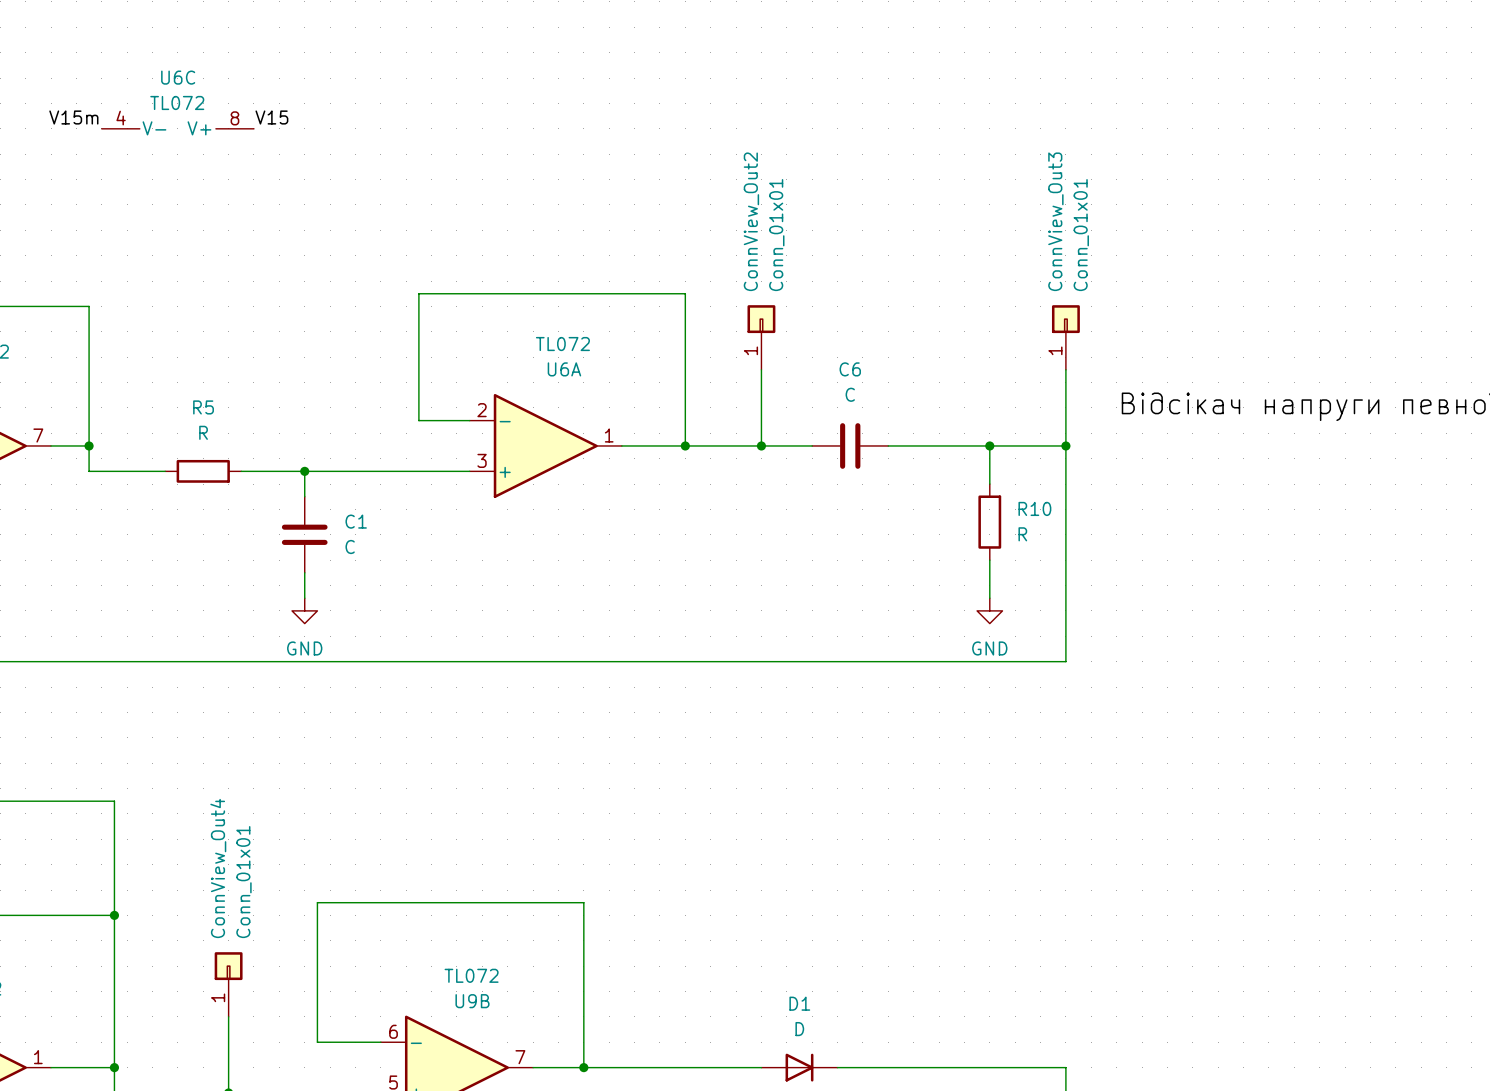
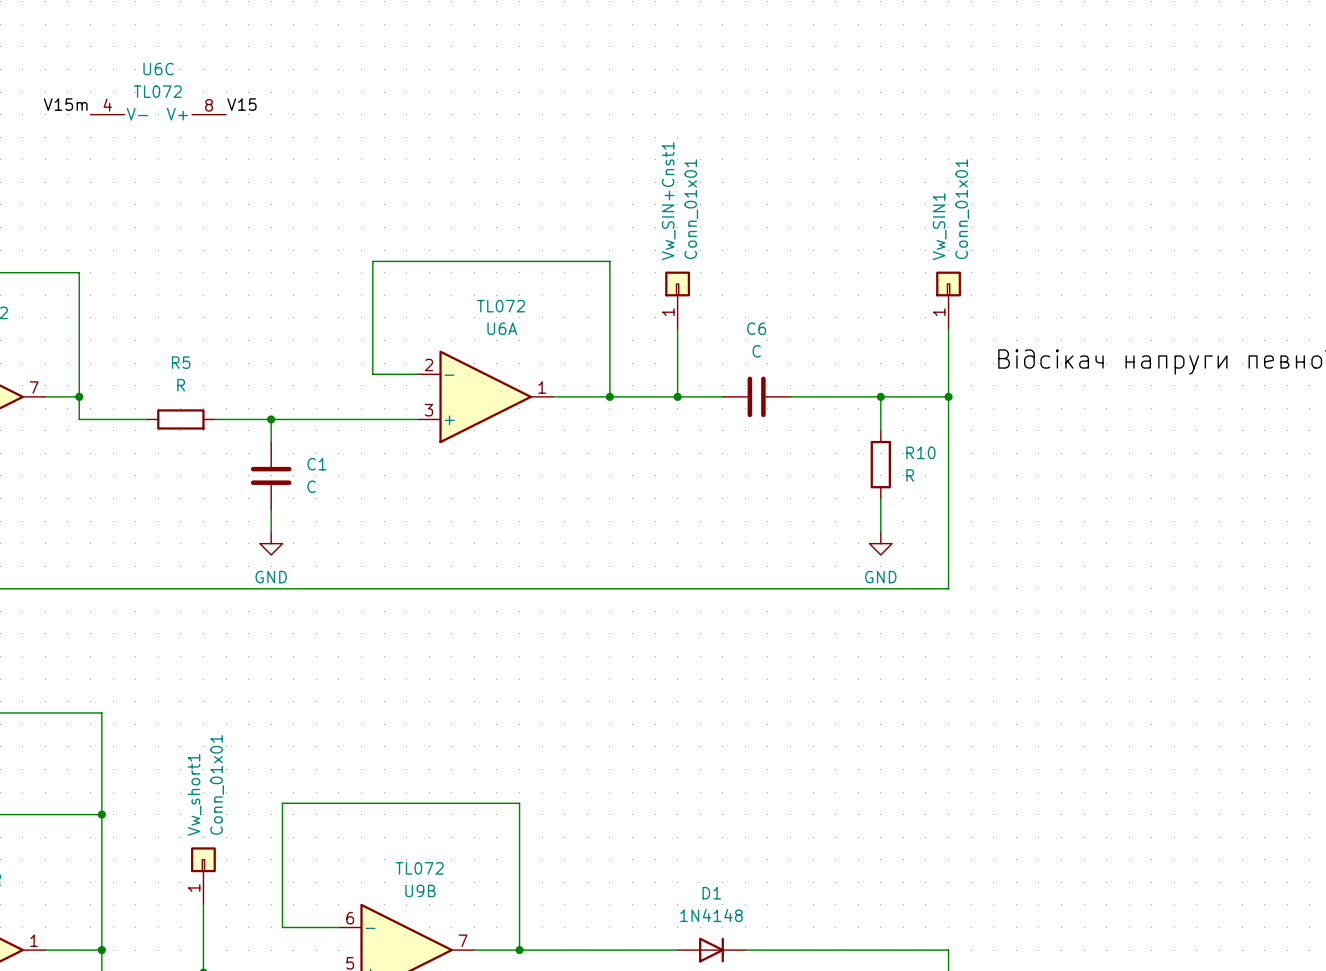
ConnView_Out2 name: ConnView_Out2 (751, 221) -> Vw_SIN+Cnst1 (668, 201)
ConnView_Out3 name: ConnView_Out3 (1055, 221) -> Vw_SIN1 (939, 226)
ConnView_Out4 name: ConnView_Out4 (218, 868) -> Vw_short1 (194, 794)
D1 value: D (799, 1029) -> 1N4148 (711, 915)

